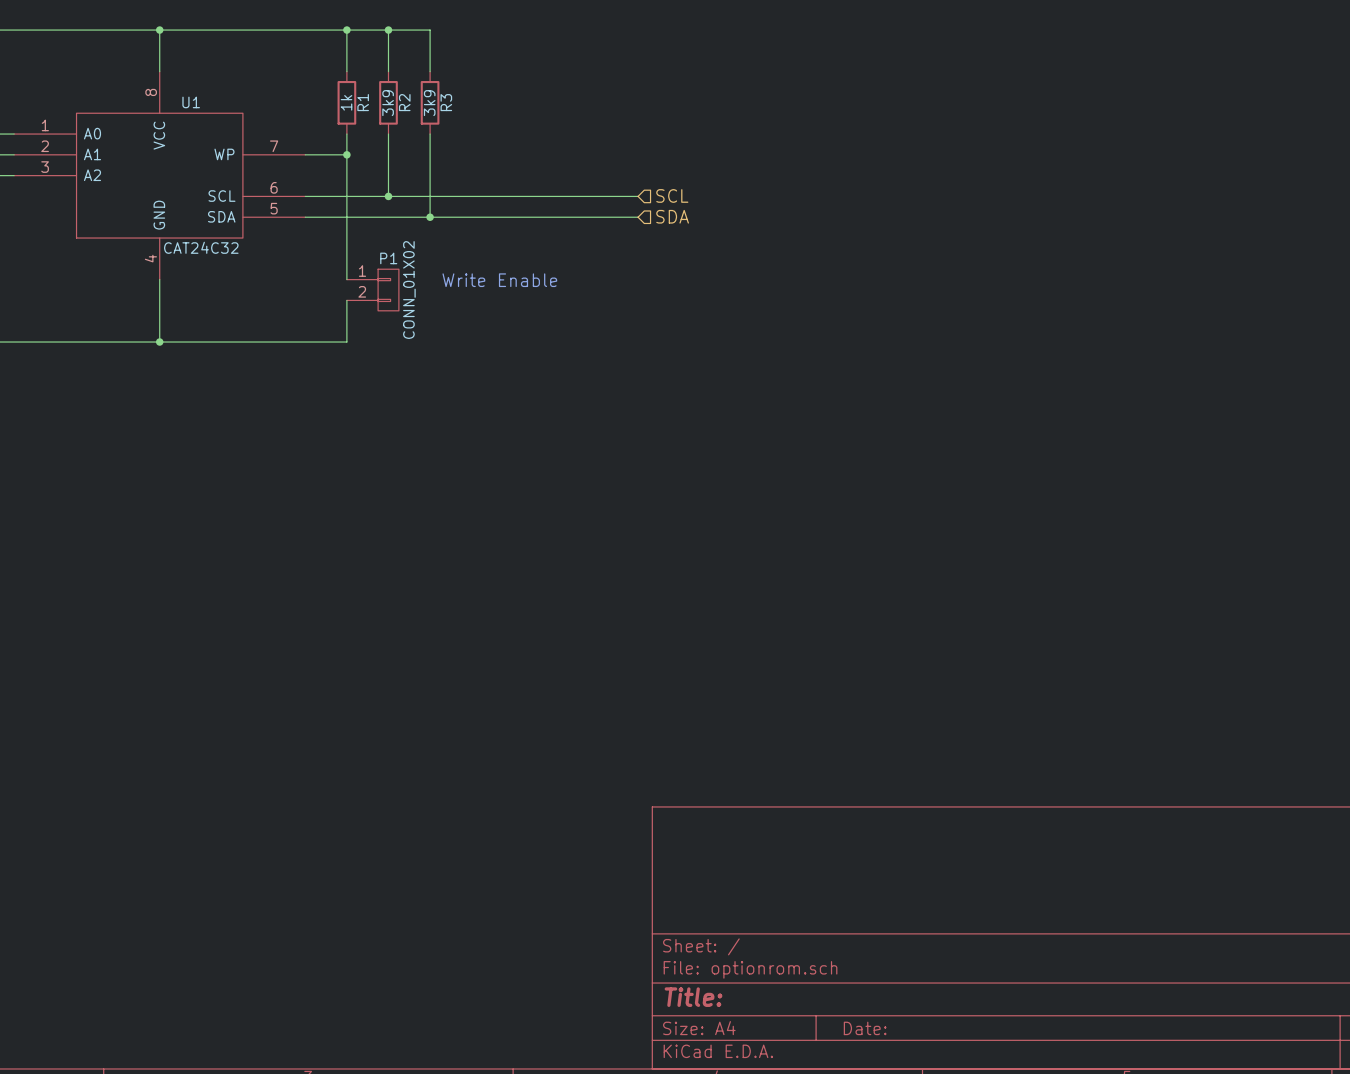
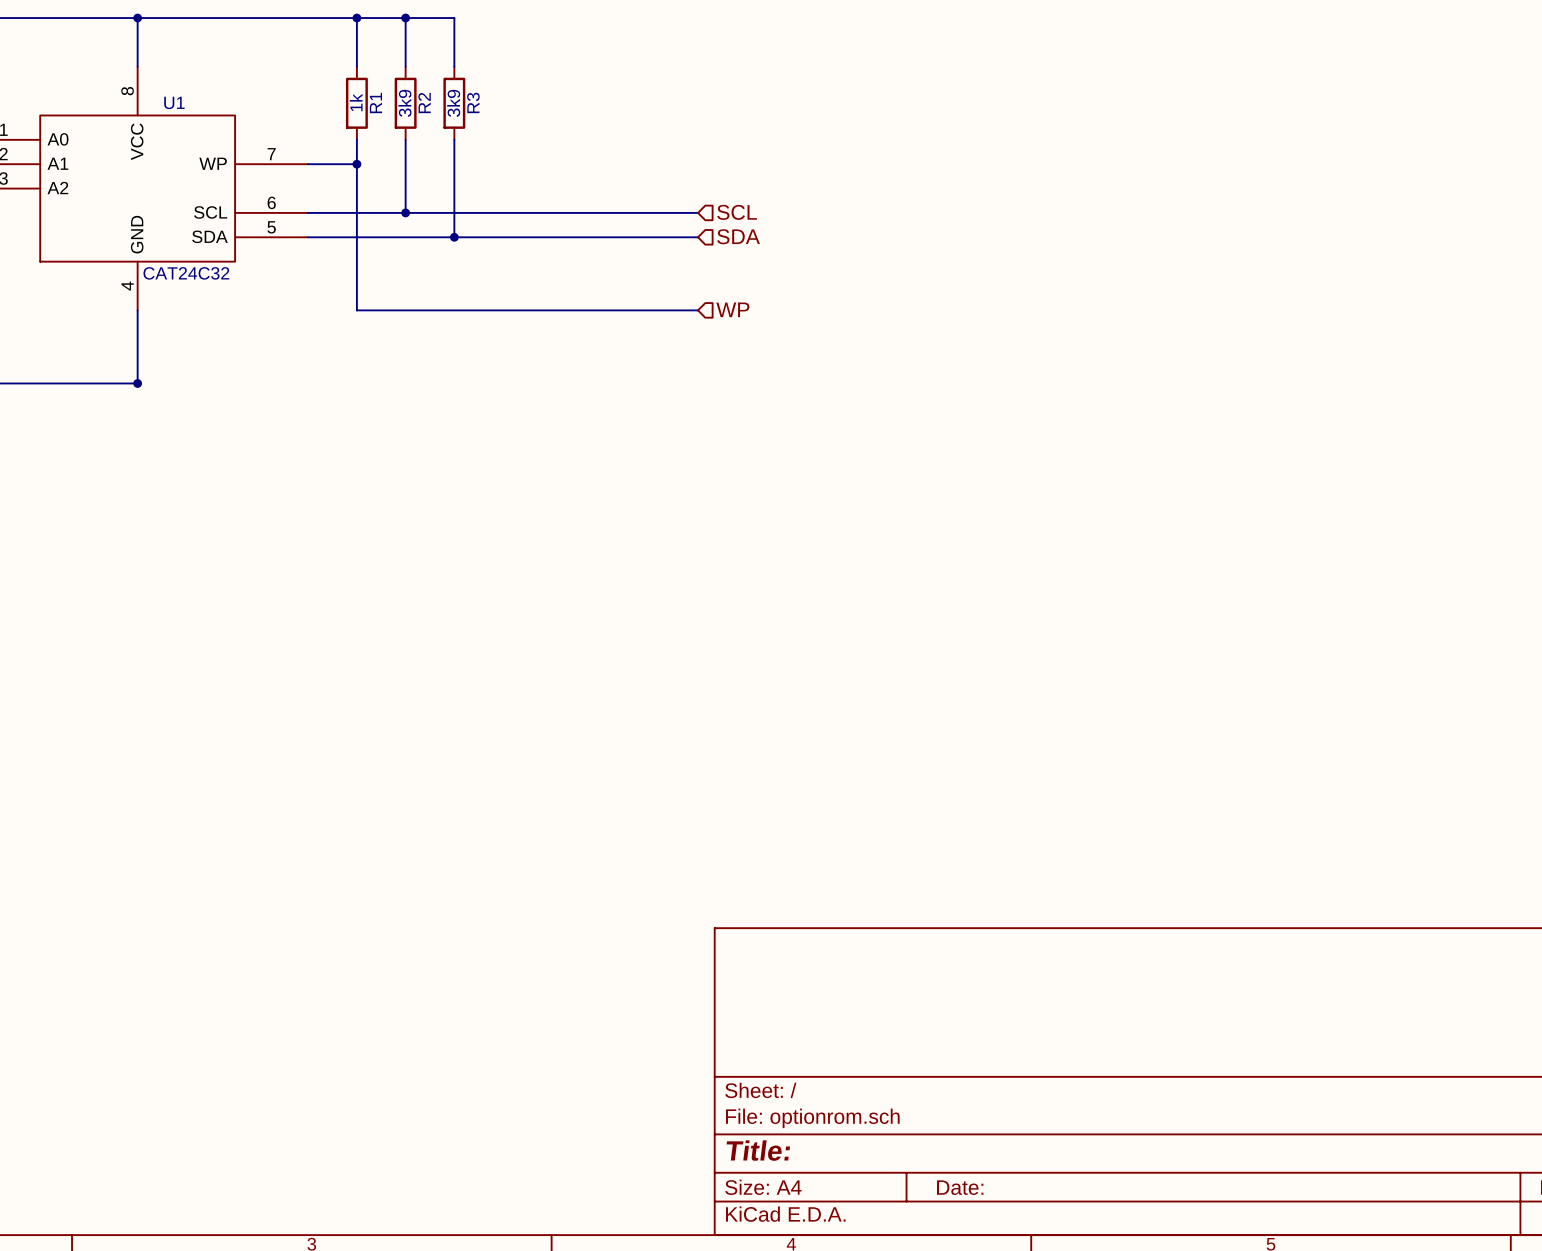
wire: none -> (356, 310) (697, 310)
hierarchical label: none -> WP (732, 309)
text: Write Enable (499, 280) -> none
P1: CONN_01X02 (372, 290) -> none
wire: (346, 300) (346, 342) (159, 342) -> none

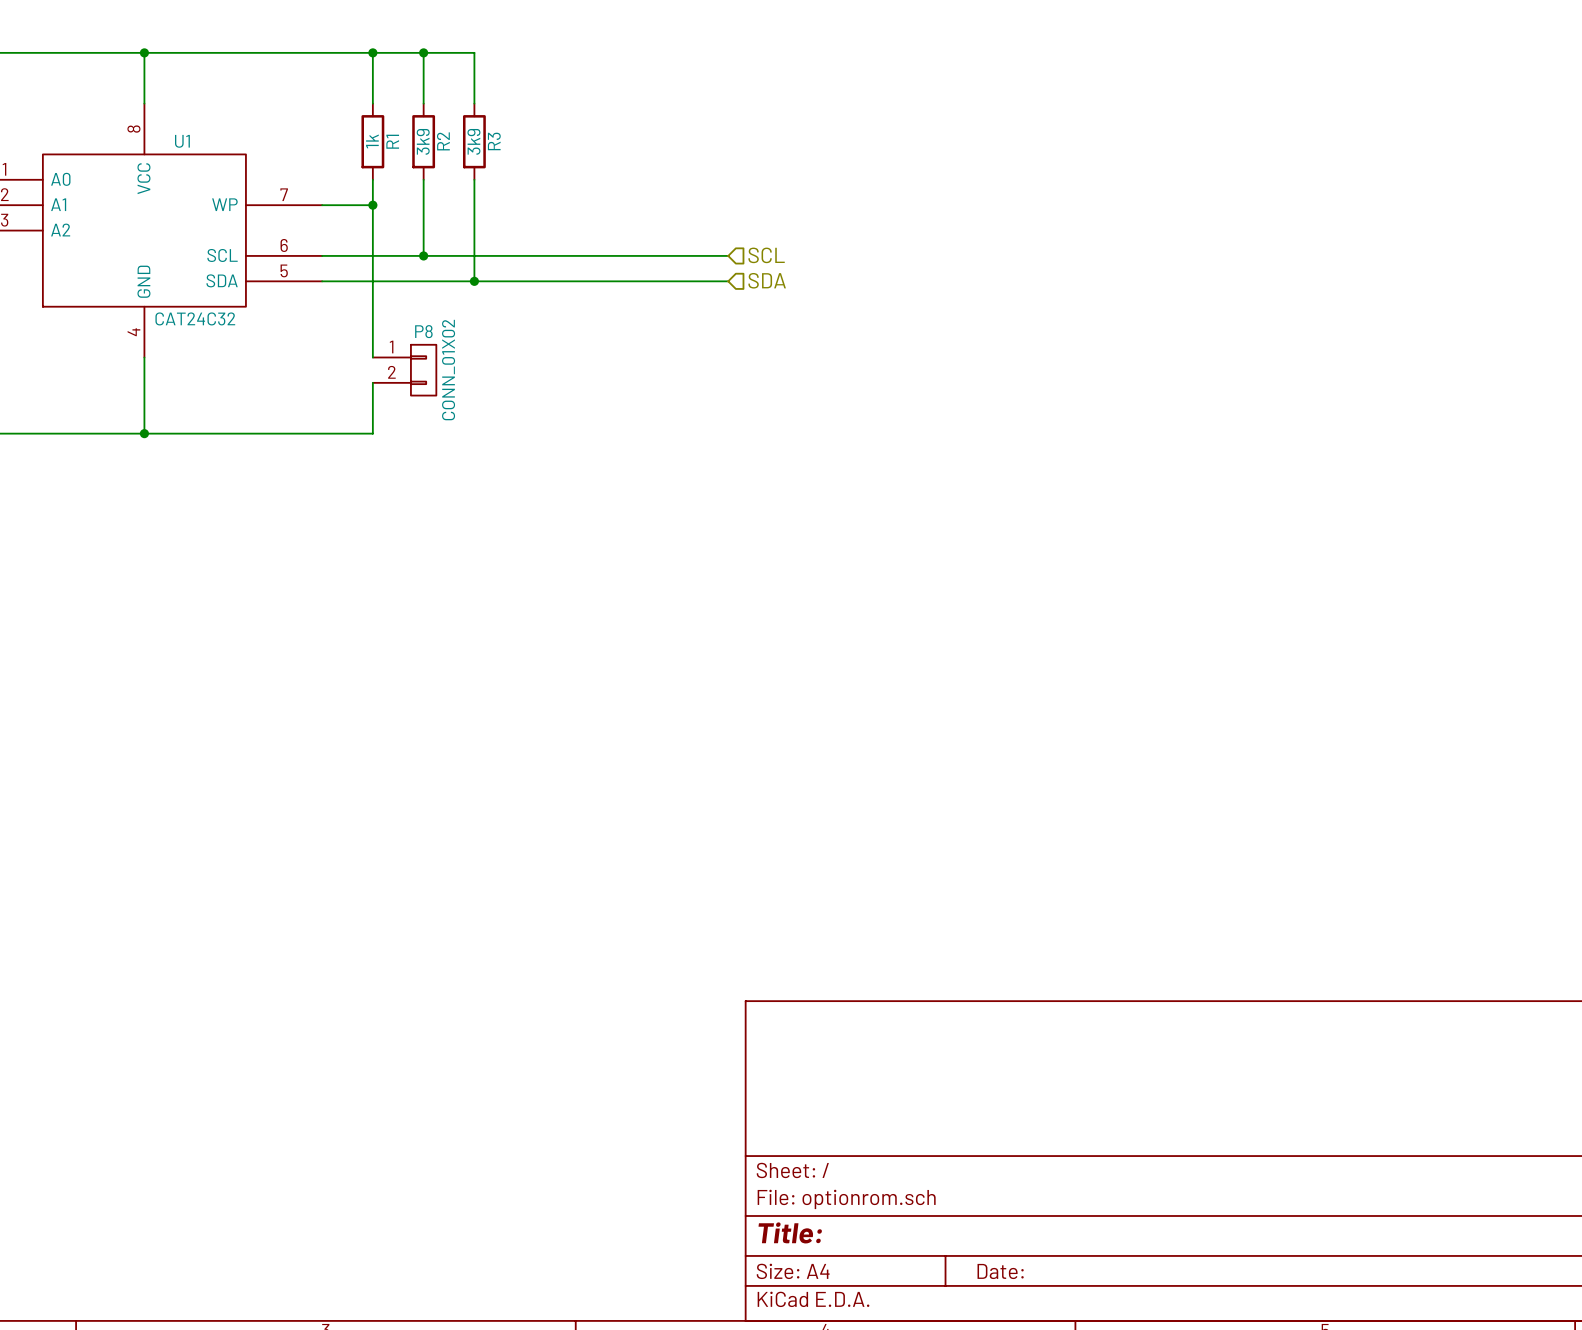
hierarchical label: WP (732, 309) -> none
wire: (356, 310) (697, 310) -> none
P8: none -> CONN_01X02 (404, 370)
wire: none -> (372, 382) (372, 433) (144, 433)

